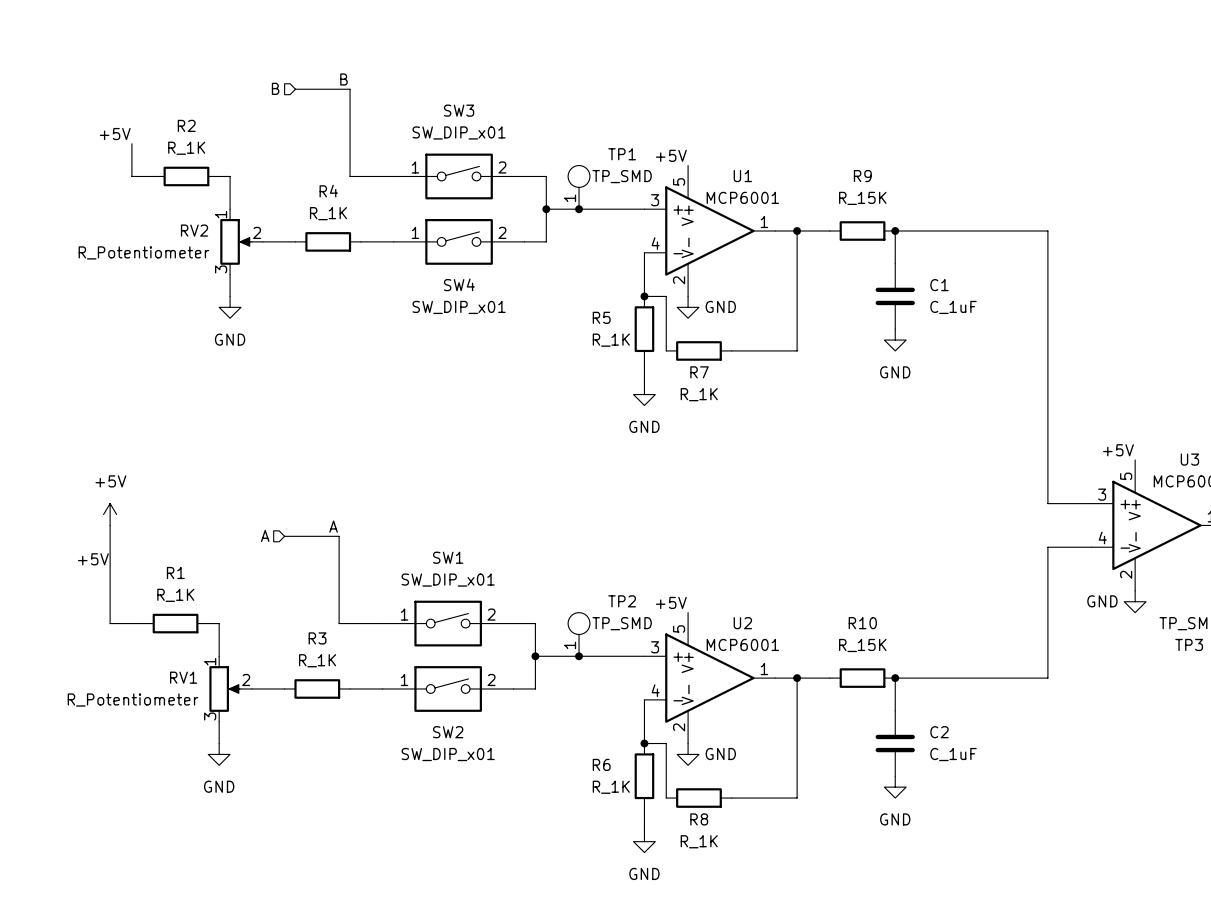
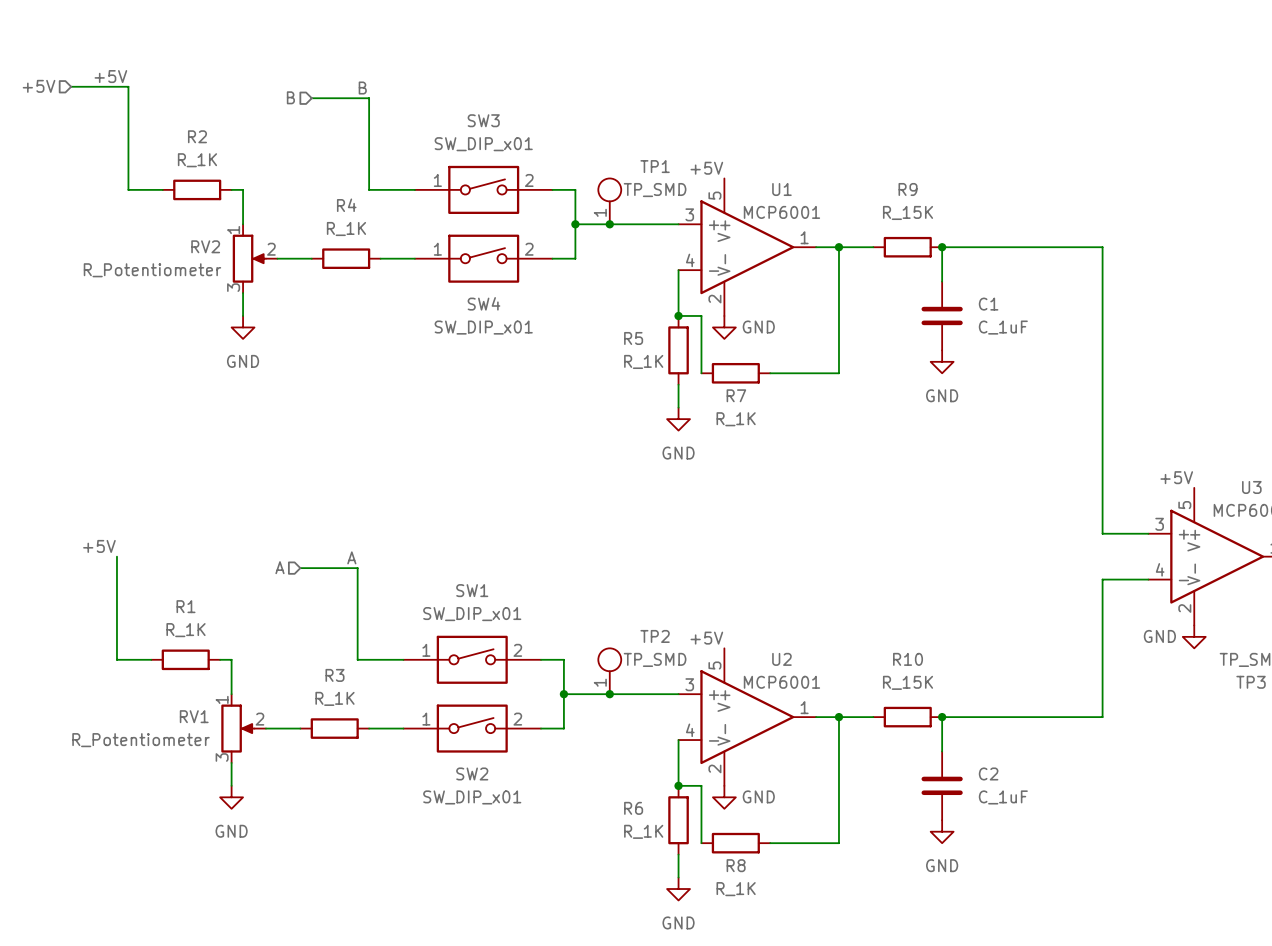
hierarchical label: none -> +5V (39, 86)
label position: +5V (115, 134) -> +5V (110, 76)
wire: (131, 143) (131, 176) -> (71, 86) (128, 86) (128, 189) (139, 189)
power symbol: +5V (110, 514) -> none
label position: +5V (93, 559) -> +5V (99, 546)

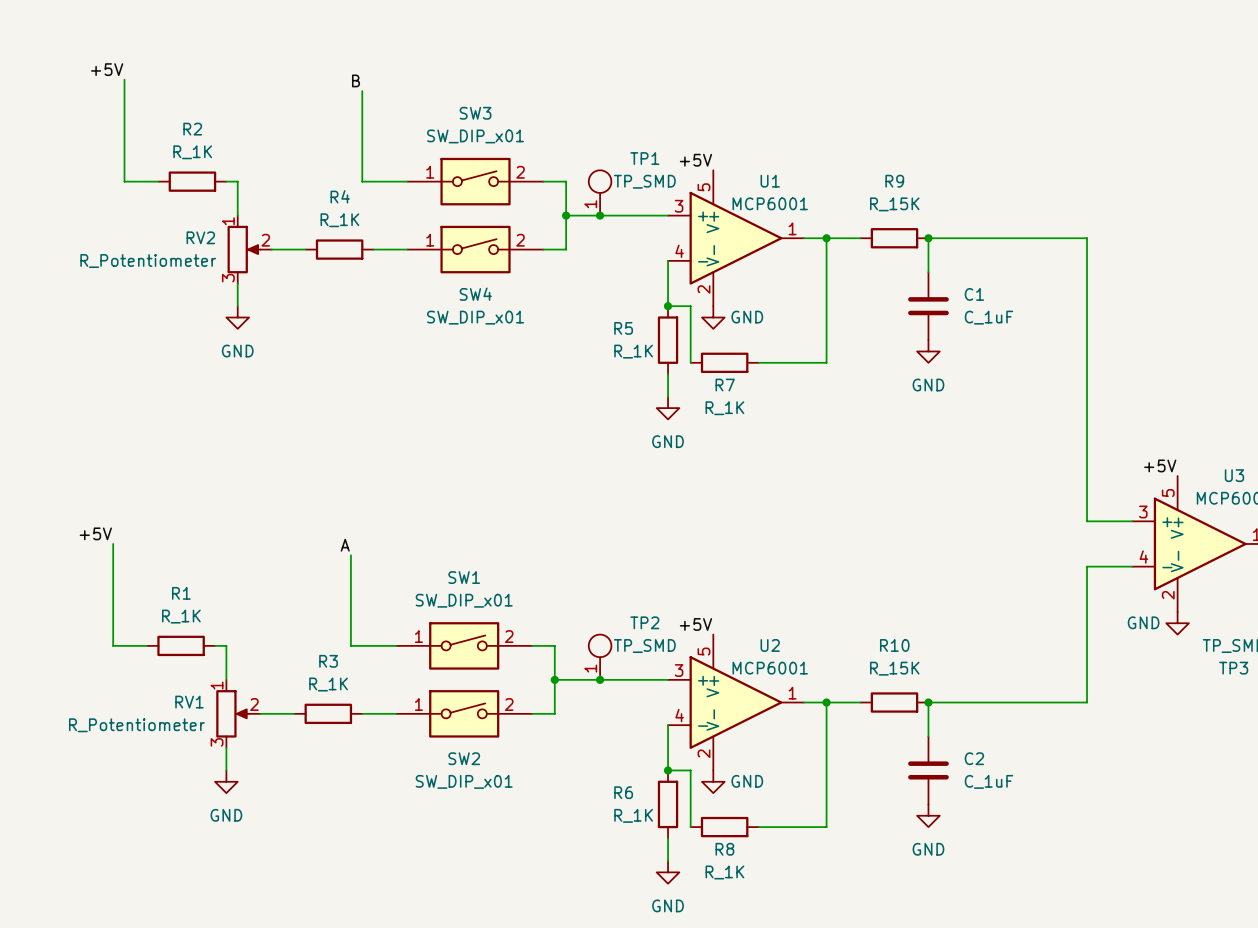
hierarchical label: +5V (39, 86) -> none
wire: (71, 86) (128, 86) -> none
hierarchical label: B (290, 97) -> none
wire: (311, 98) (369, 98) -> none
hierarchical label: A (279, 567) -> none
wire: (300, 568) (357, 568) -> none

